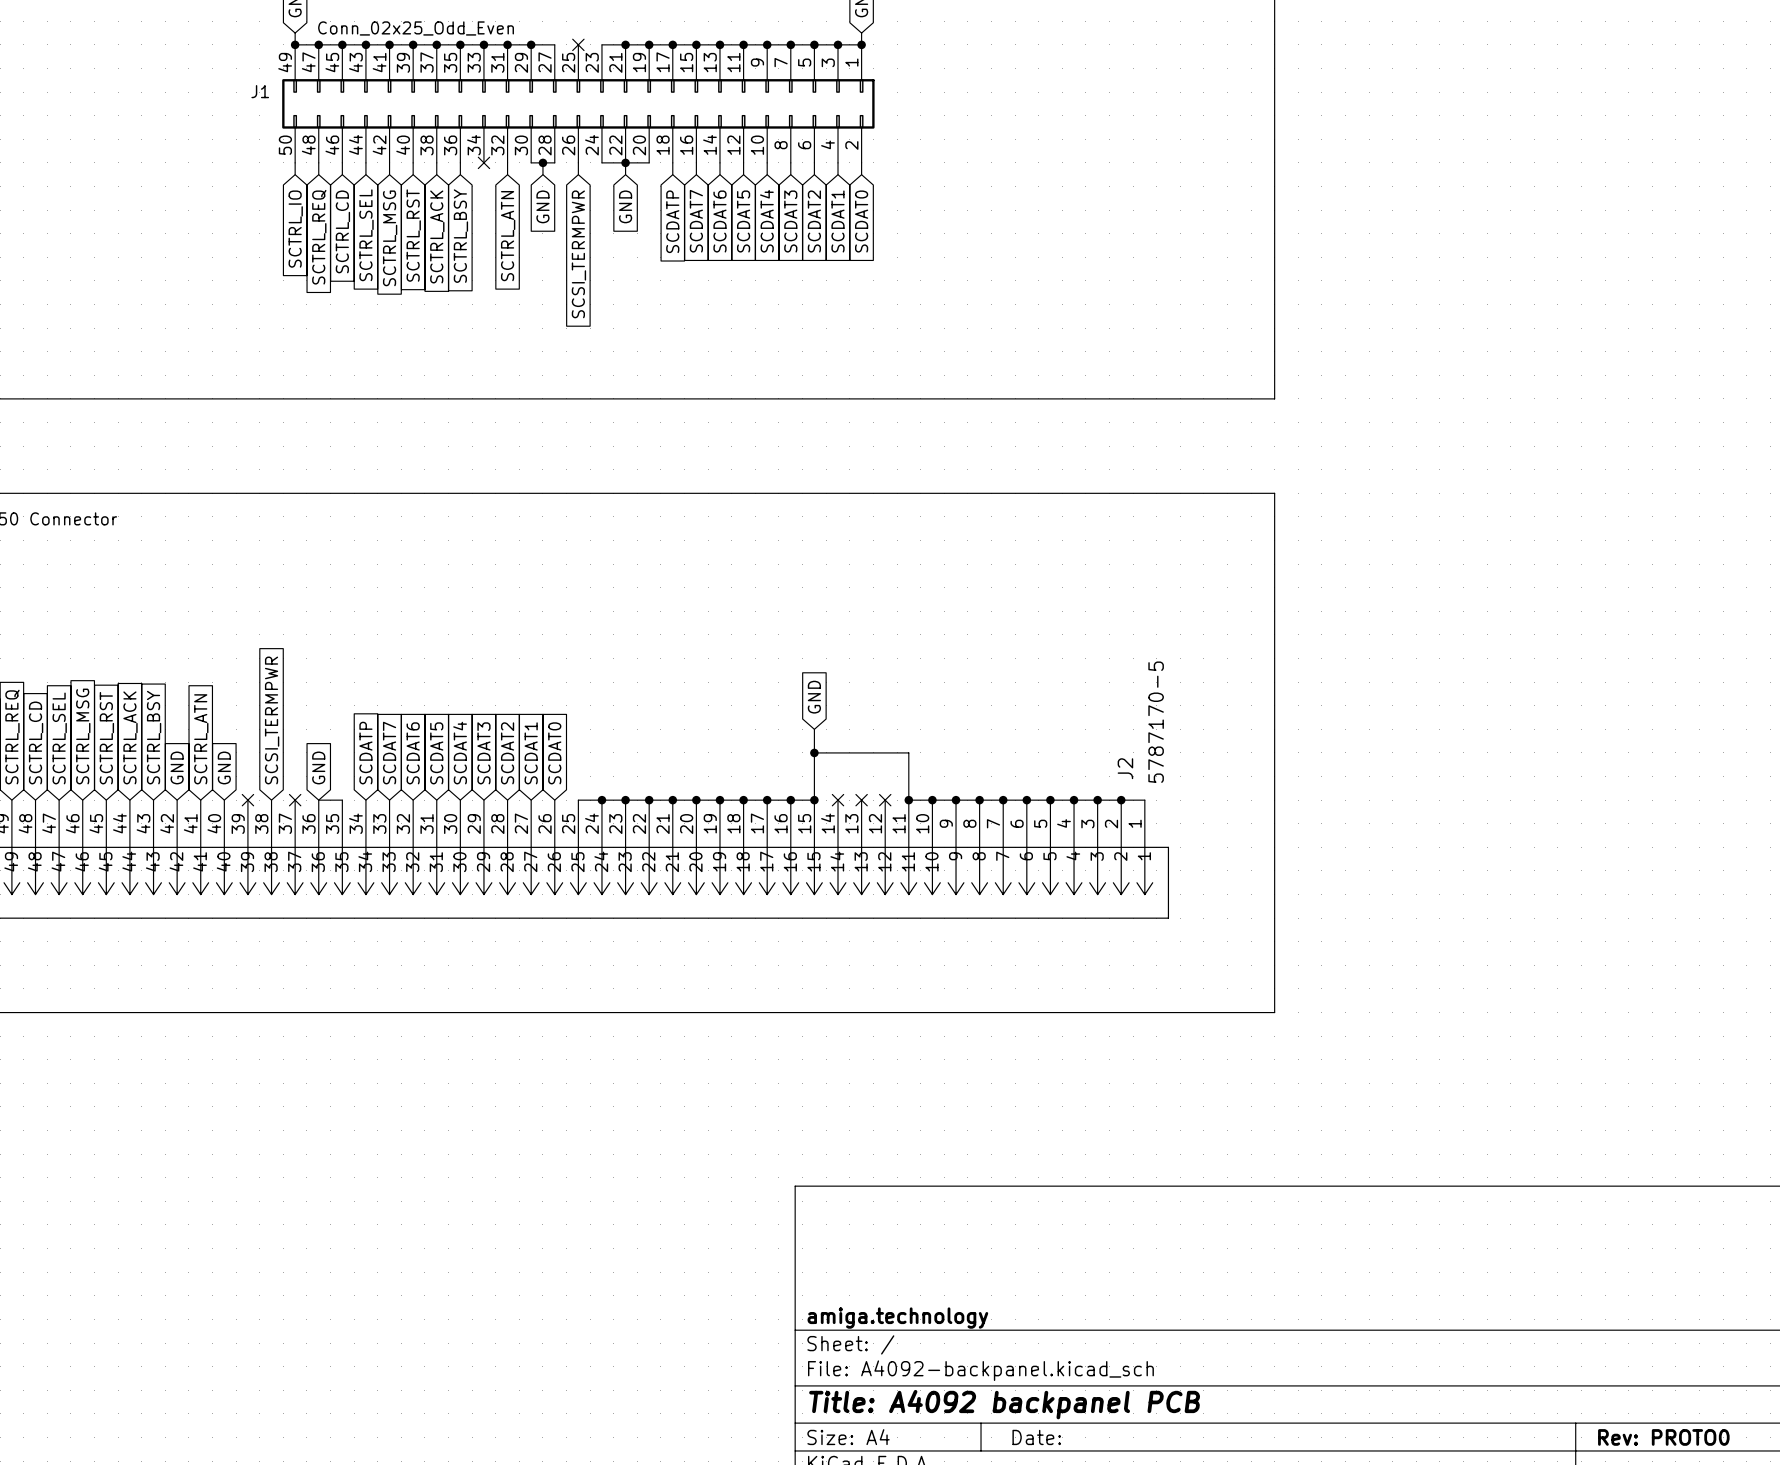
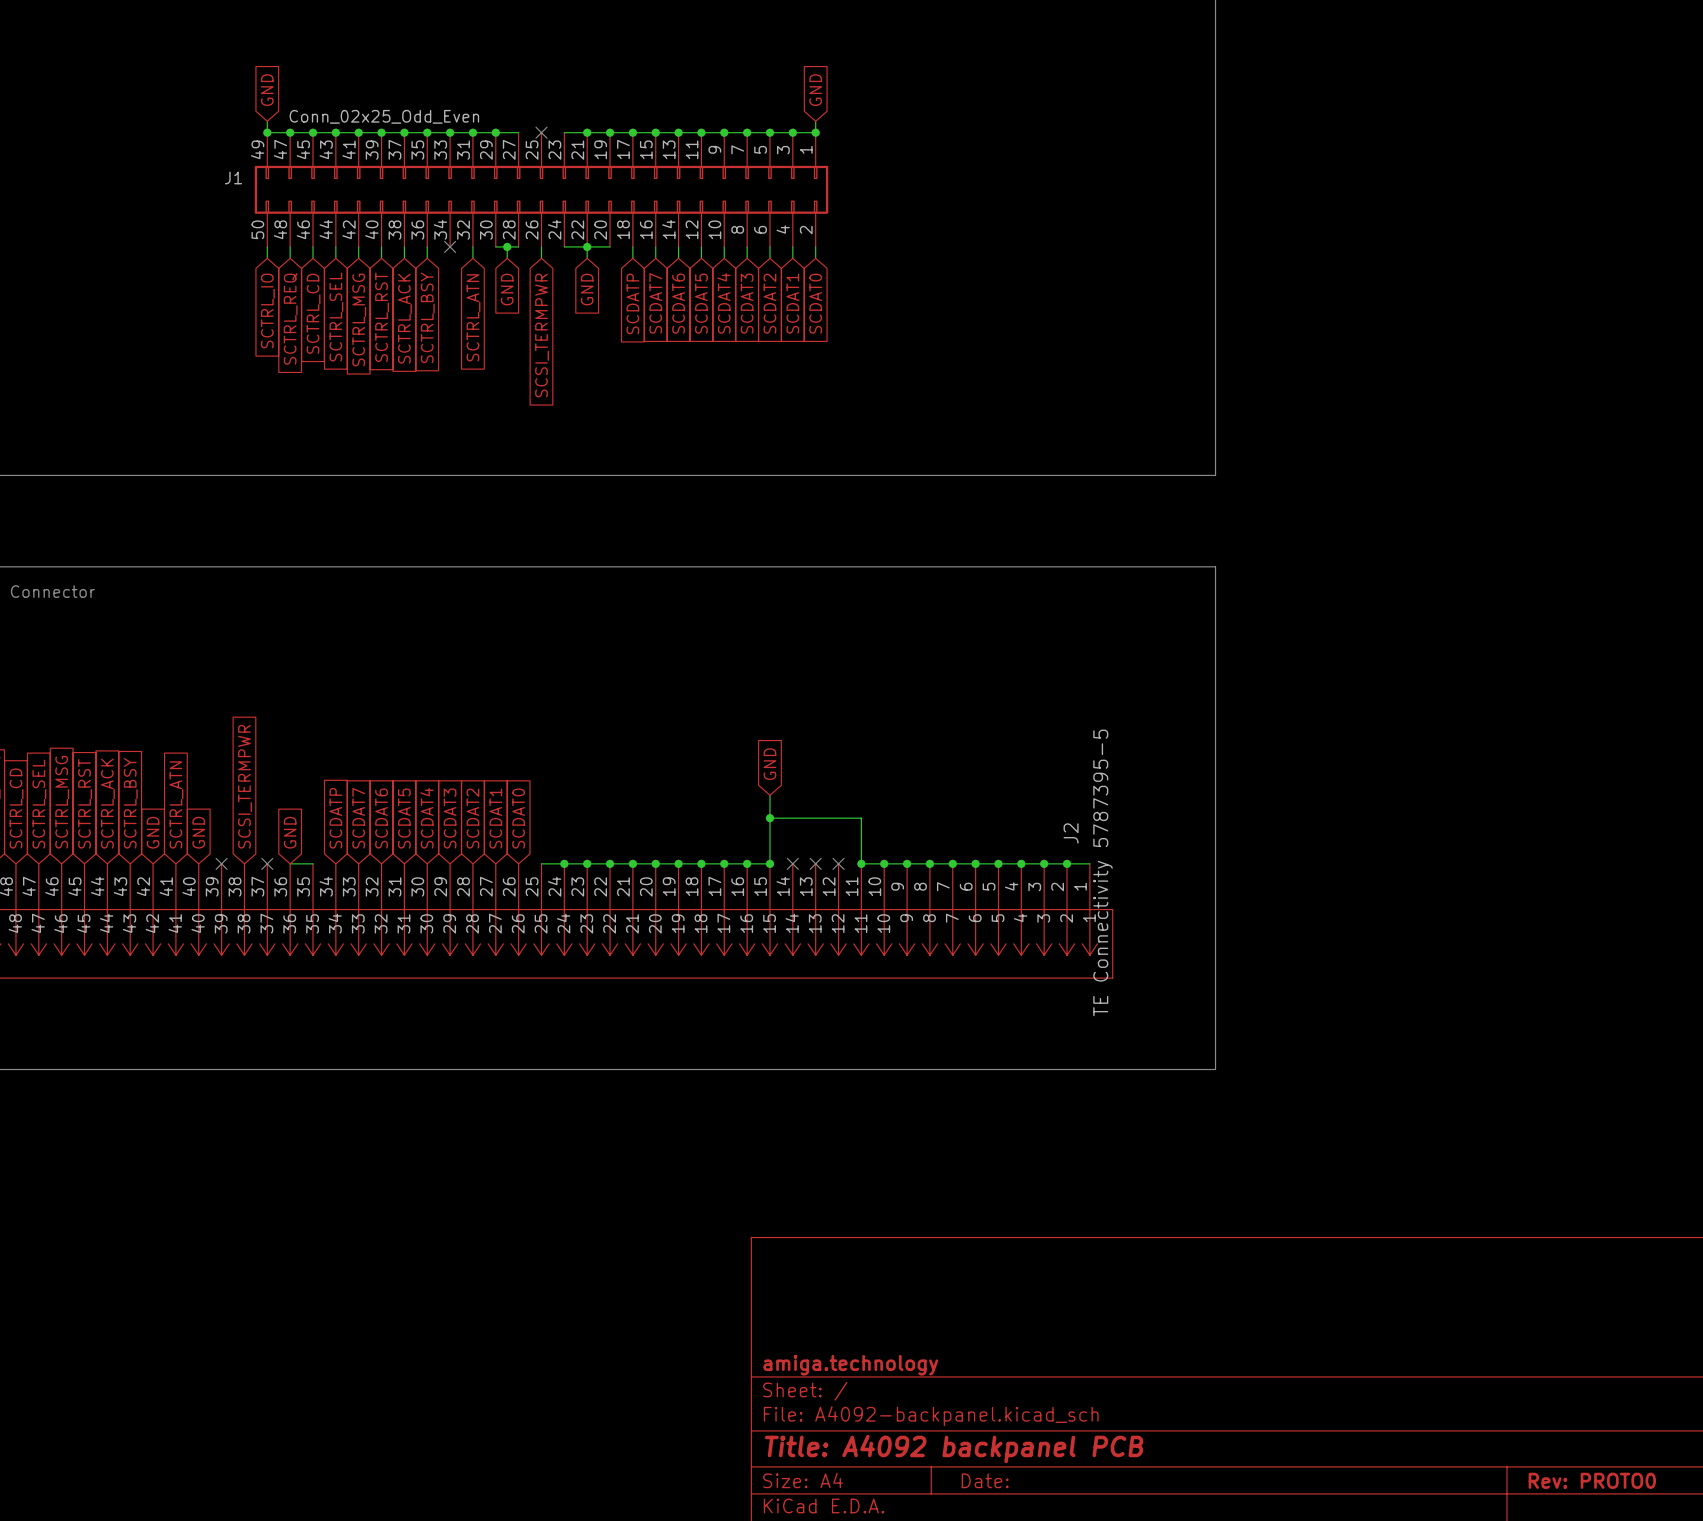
J2 value: 5787170-5 (1156, 722) -> TE Connectivity 5787395-5 (1103, 872)

